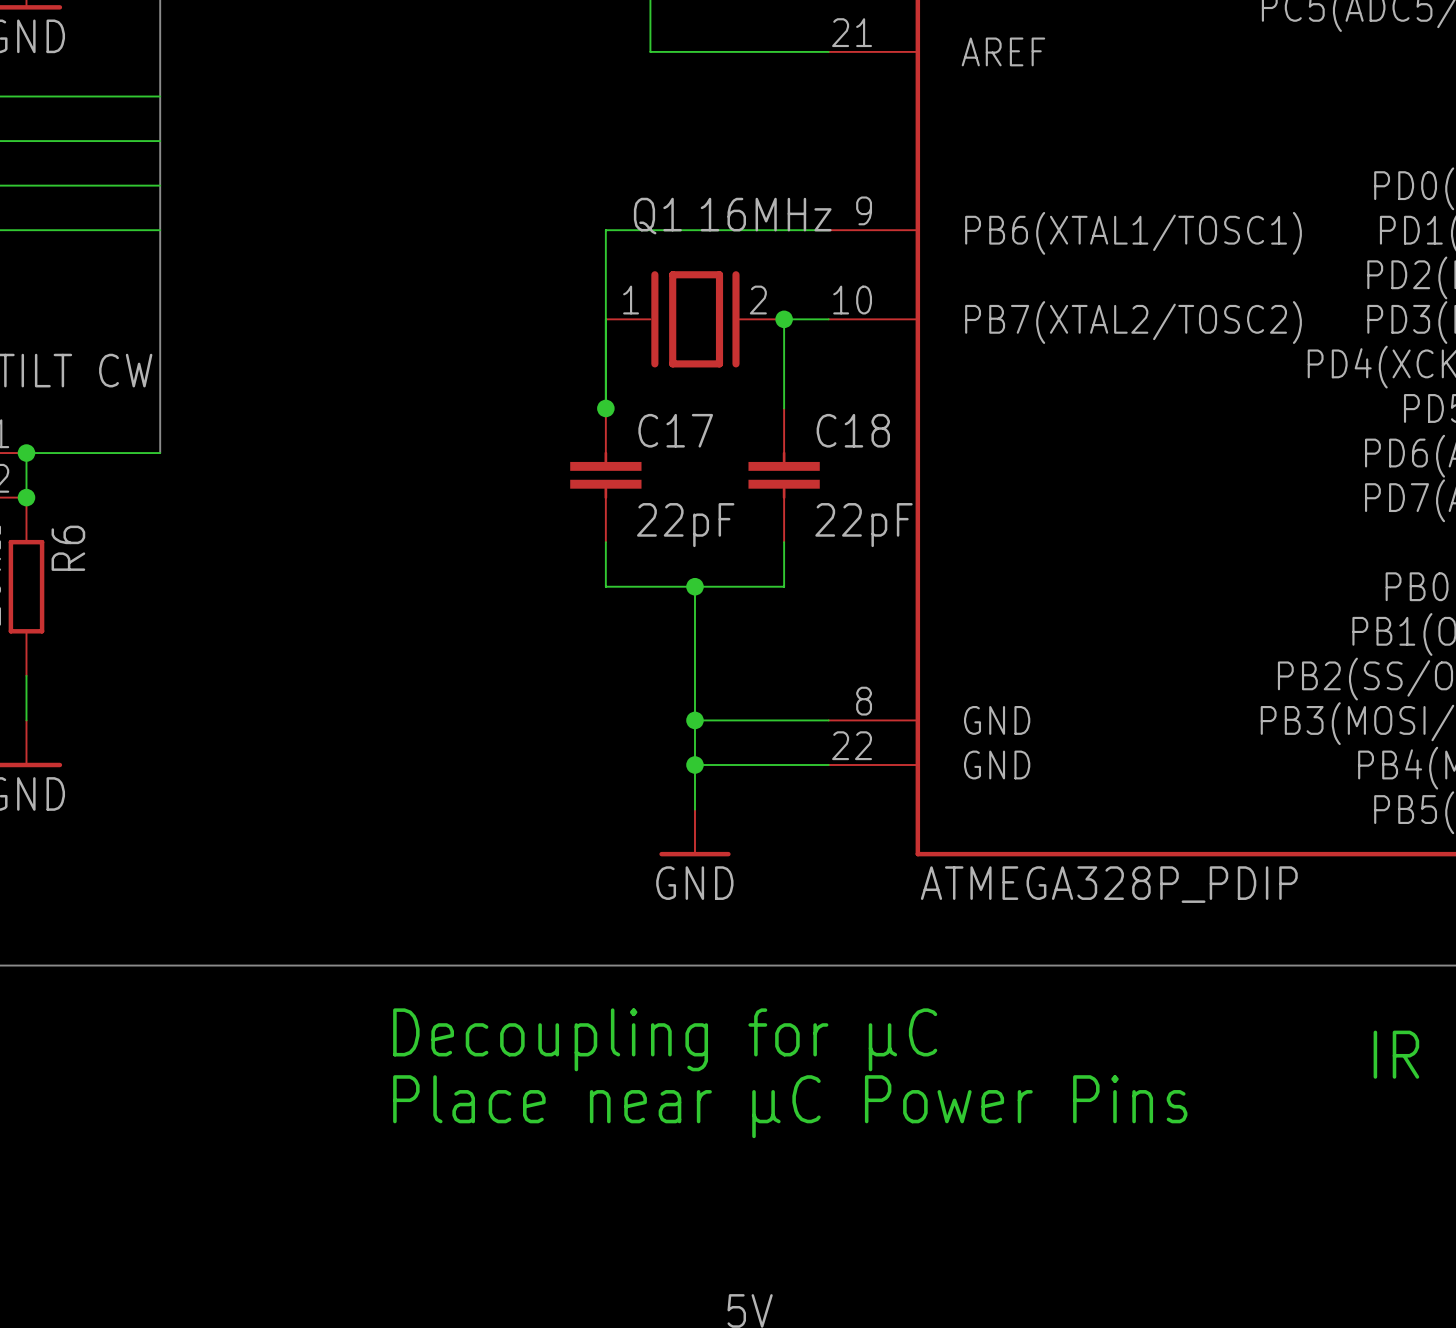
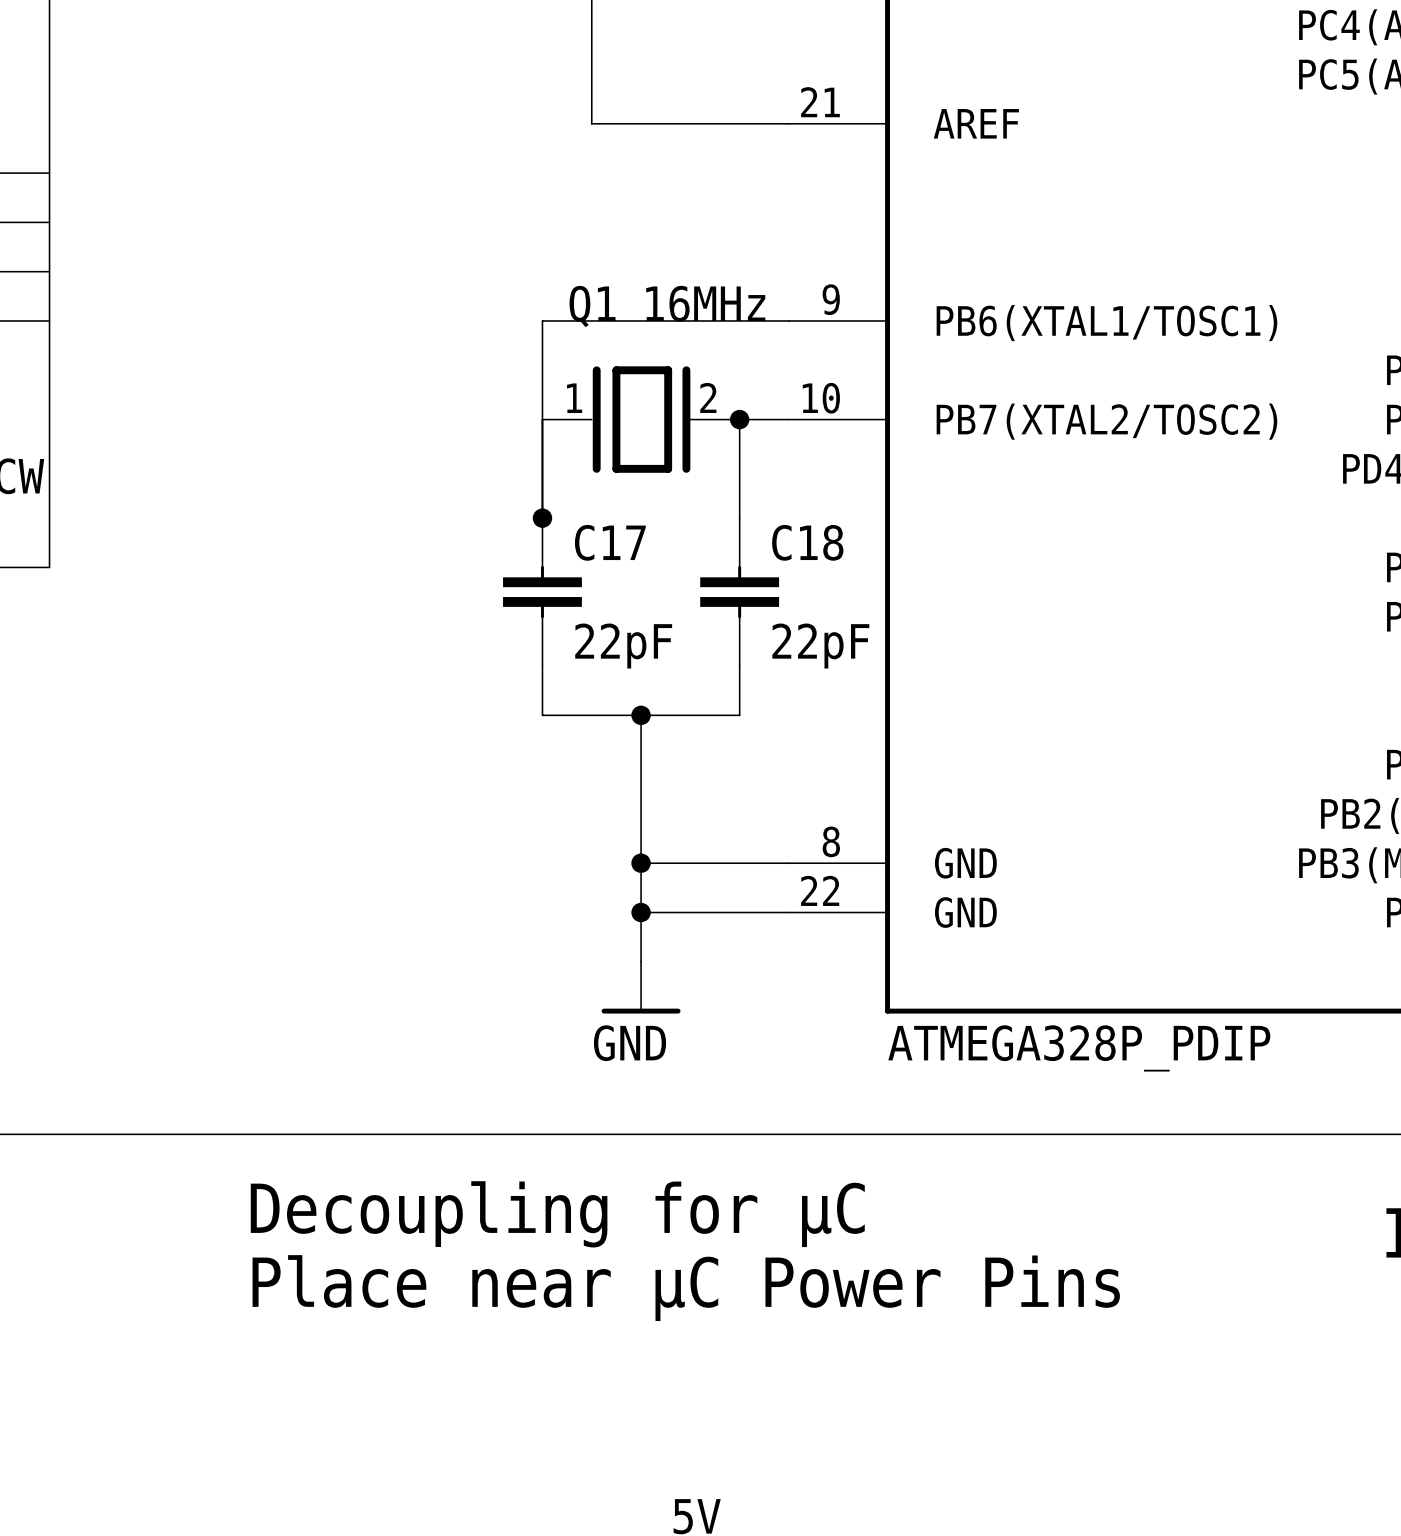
text position: Decoupling for µC (665, 1039) -> Decoupling for µC (557, 1214)
text position: Place near µC Power Pins (790, 1106) -> Place near µC Power Pins (686, 1288)

